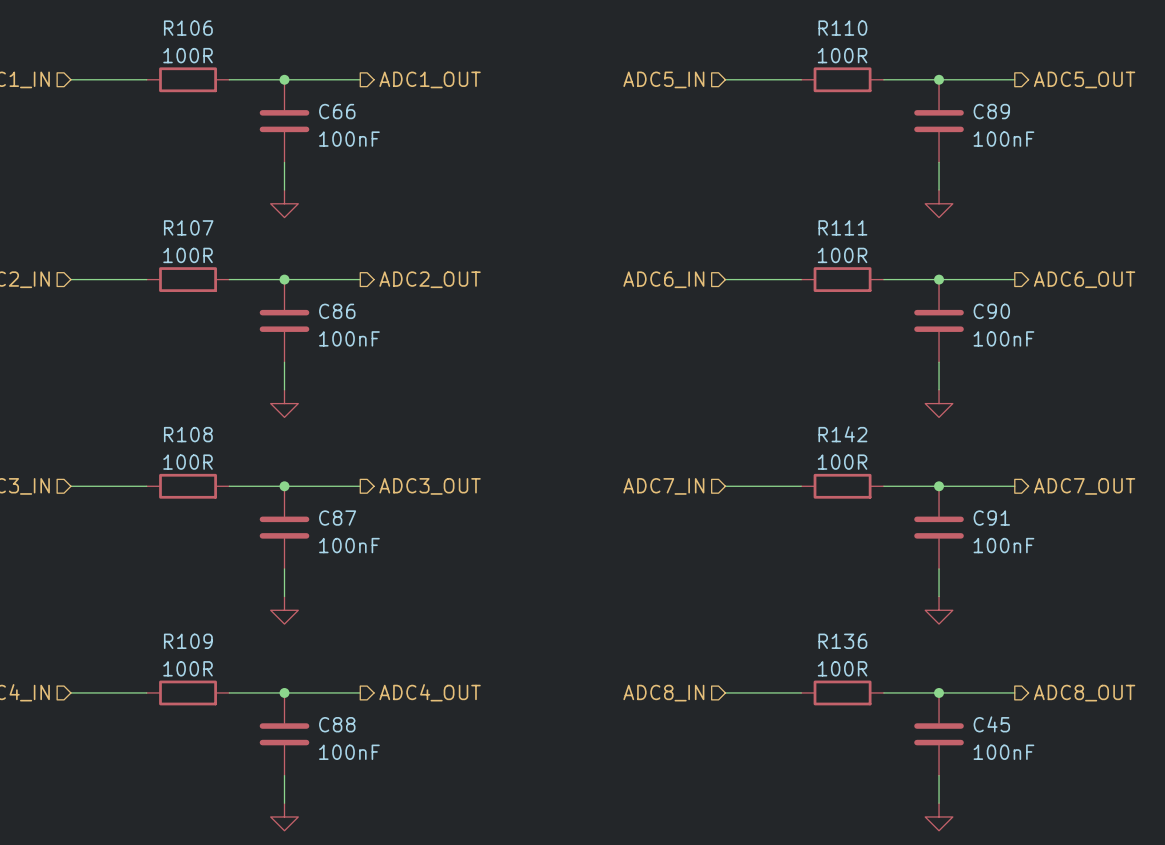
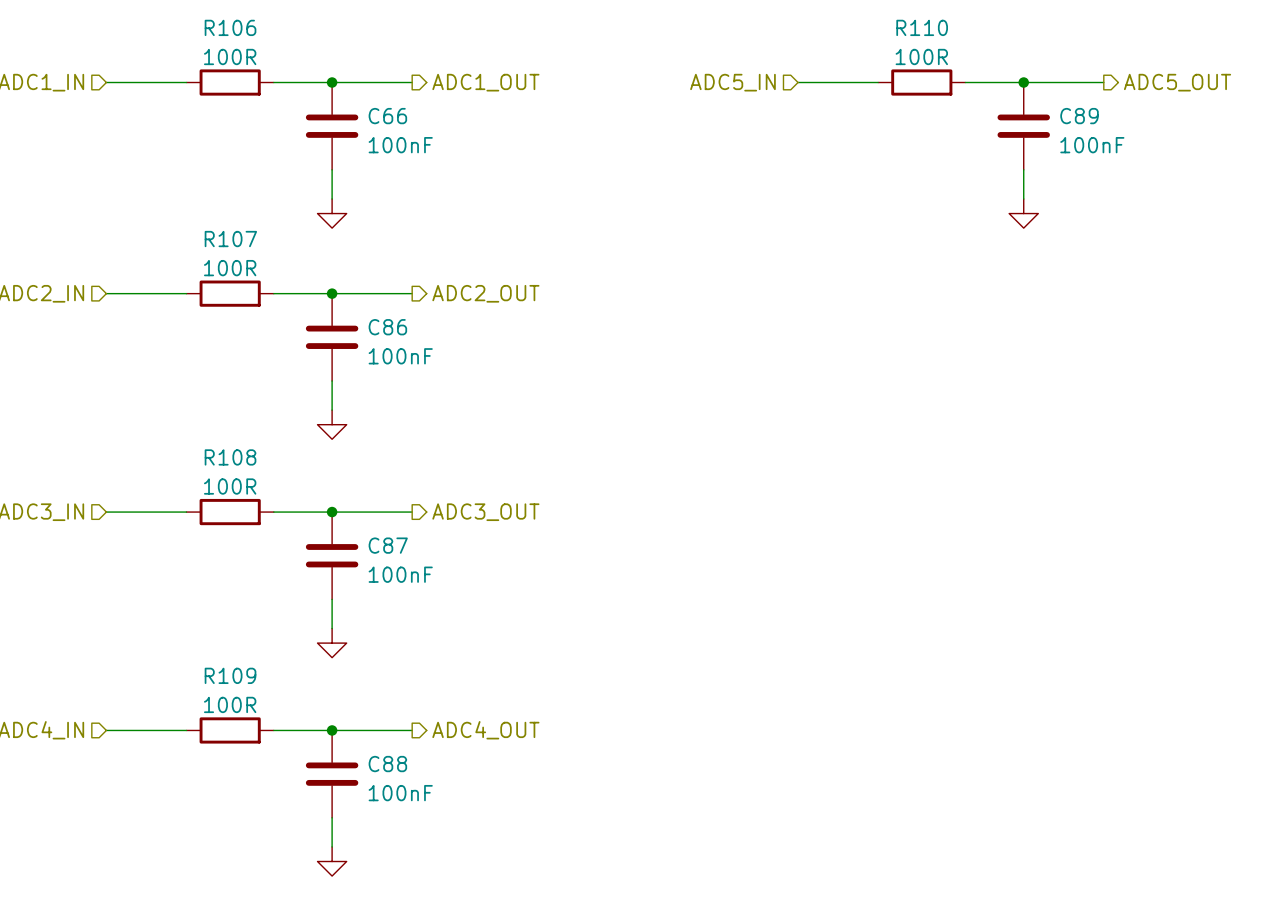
hierarchical label: ADC6_IN (663, 279) -> none
wire: (725, 279) (801, 279) -> none
R111: 100R (842, 279) -> none
wire: (883, 279) (1014, 279) -> none
junction: (939, 279) -> none
hierarchical label: ADC6_OUT (1084, 279) -> none
C90: 100nF (939, 320) -> none
wire: (939, 362) (939, 389) -> none
power symbol: (939, 403) -> none
hierarchical label: ADC7_IN (663, 486) -> none
wire: (725, 486) (801, 486) -> none
R142: 100R (842, 486) -> none
wire: (883, 486) (1014, 486) -> none
junction: (939, 486) -> none
hierarchical label: ADC7_OUT (1084, 486) -> none
C91: 100nF (939, 527) -> none
wire: (939, 568) (939, 596) -> none
power symbol: (939, 610) -> none
wire: (725, 692) (801, 692) -> none
R136: 100R (842, 692) -> none
wire: (883, 692) (1014, 692) -> none
junction: (939, 692) -> none
hierarchical label: ADC8_IN (663, 693) -> none
hierarchical label: ADC8_OUT (1084, 693) -> none
C45: 100nF (939, 734) -> none
wire: (939, 775) (939, 803) -> none
power symbol: (939, 816) -> none

